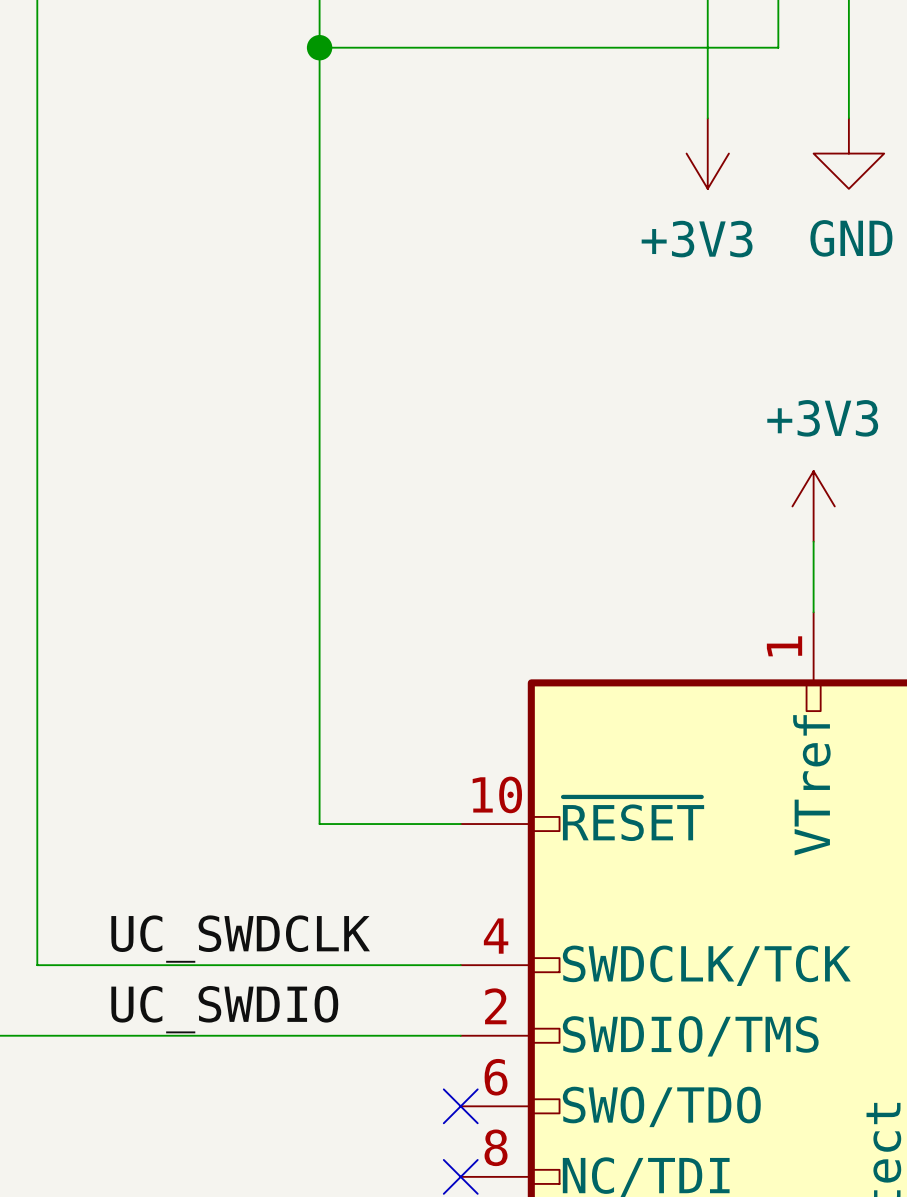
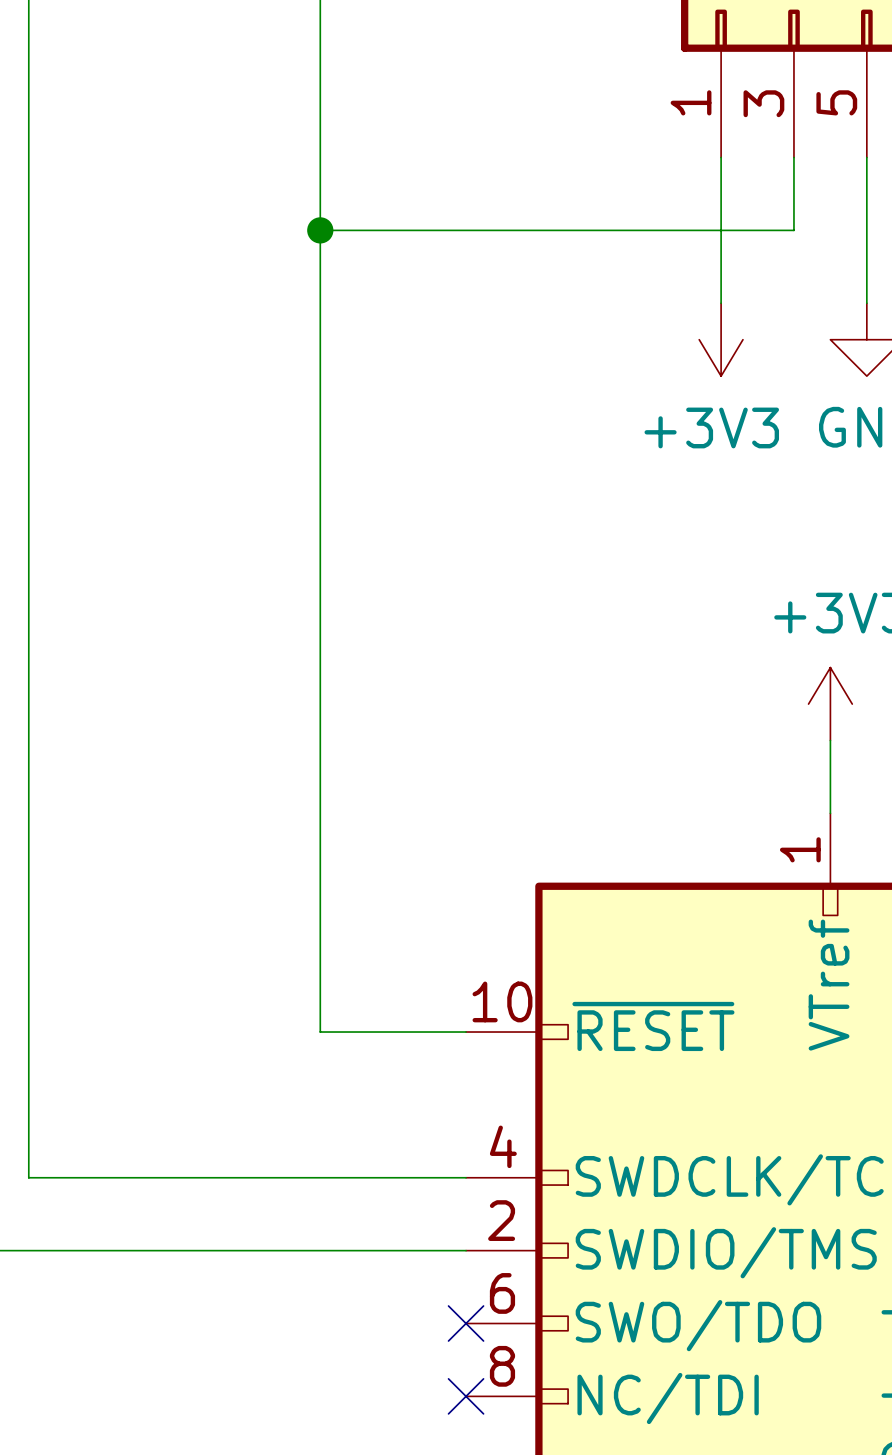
label: UC_SWDCLK (240, 939) -> none
label: UC_SWDIO (224, 1009) -> none

